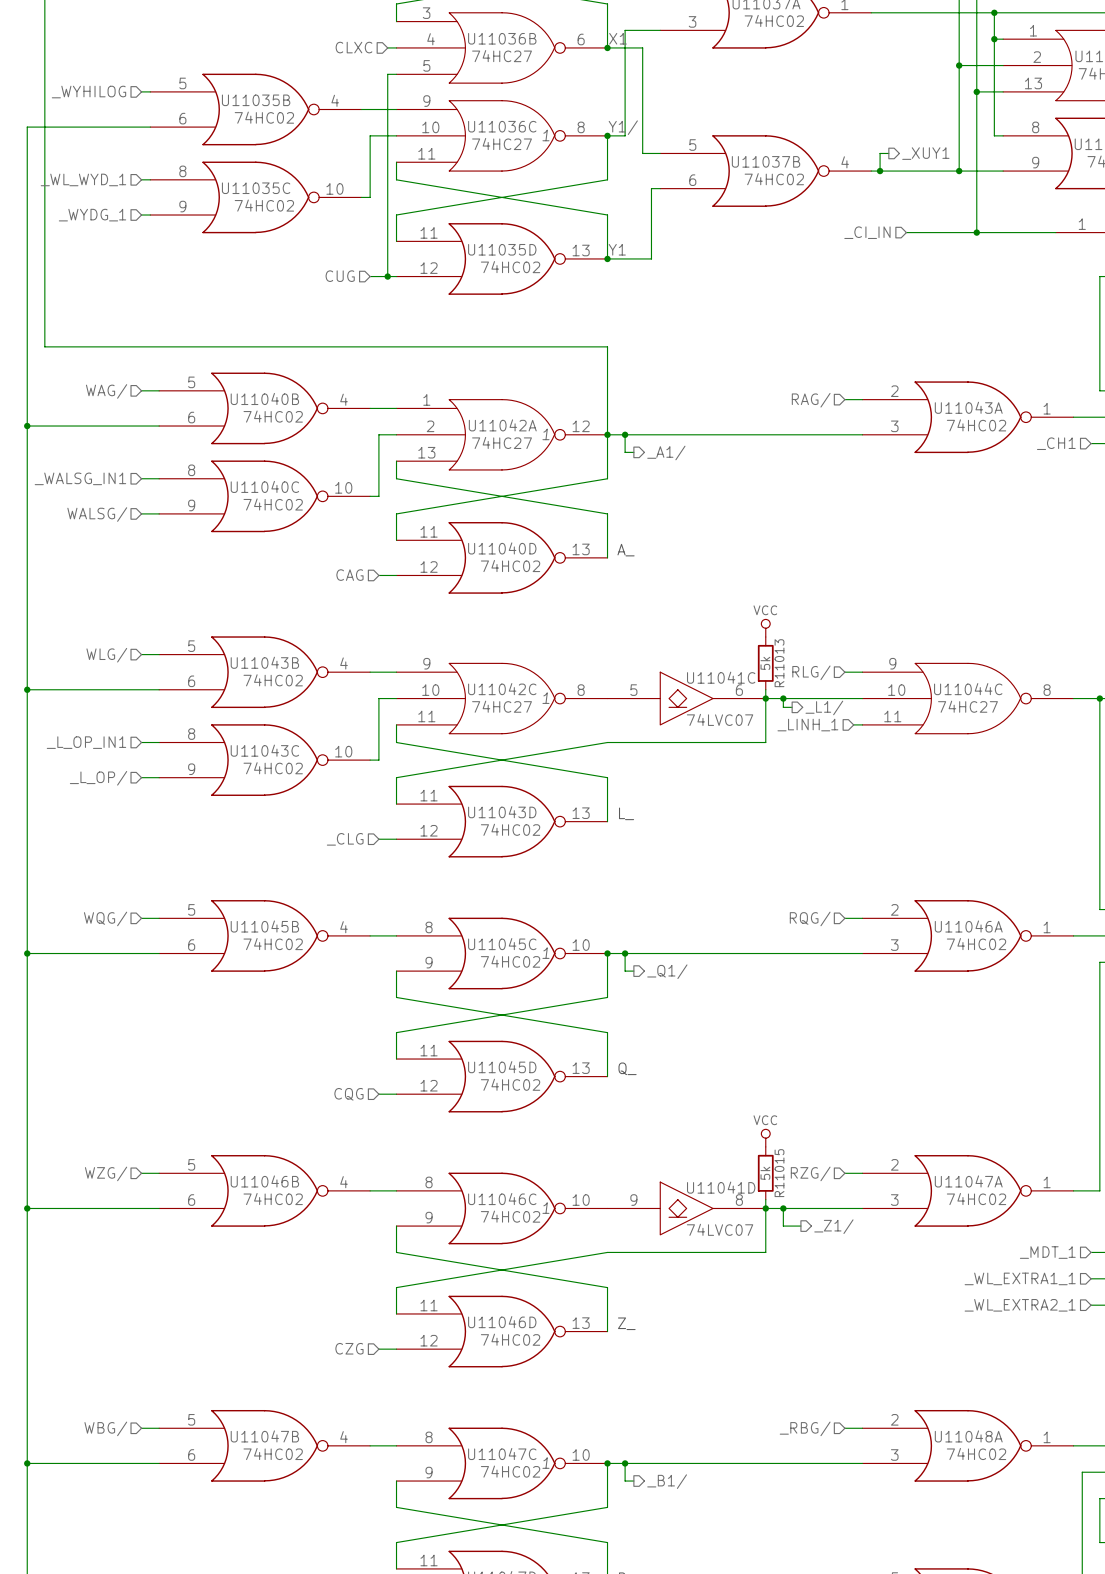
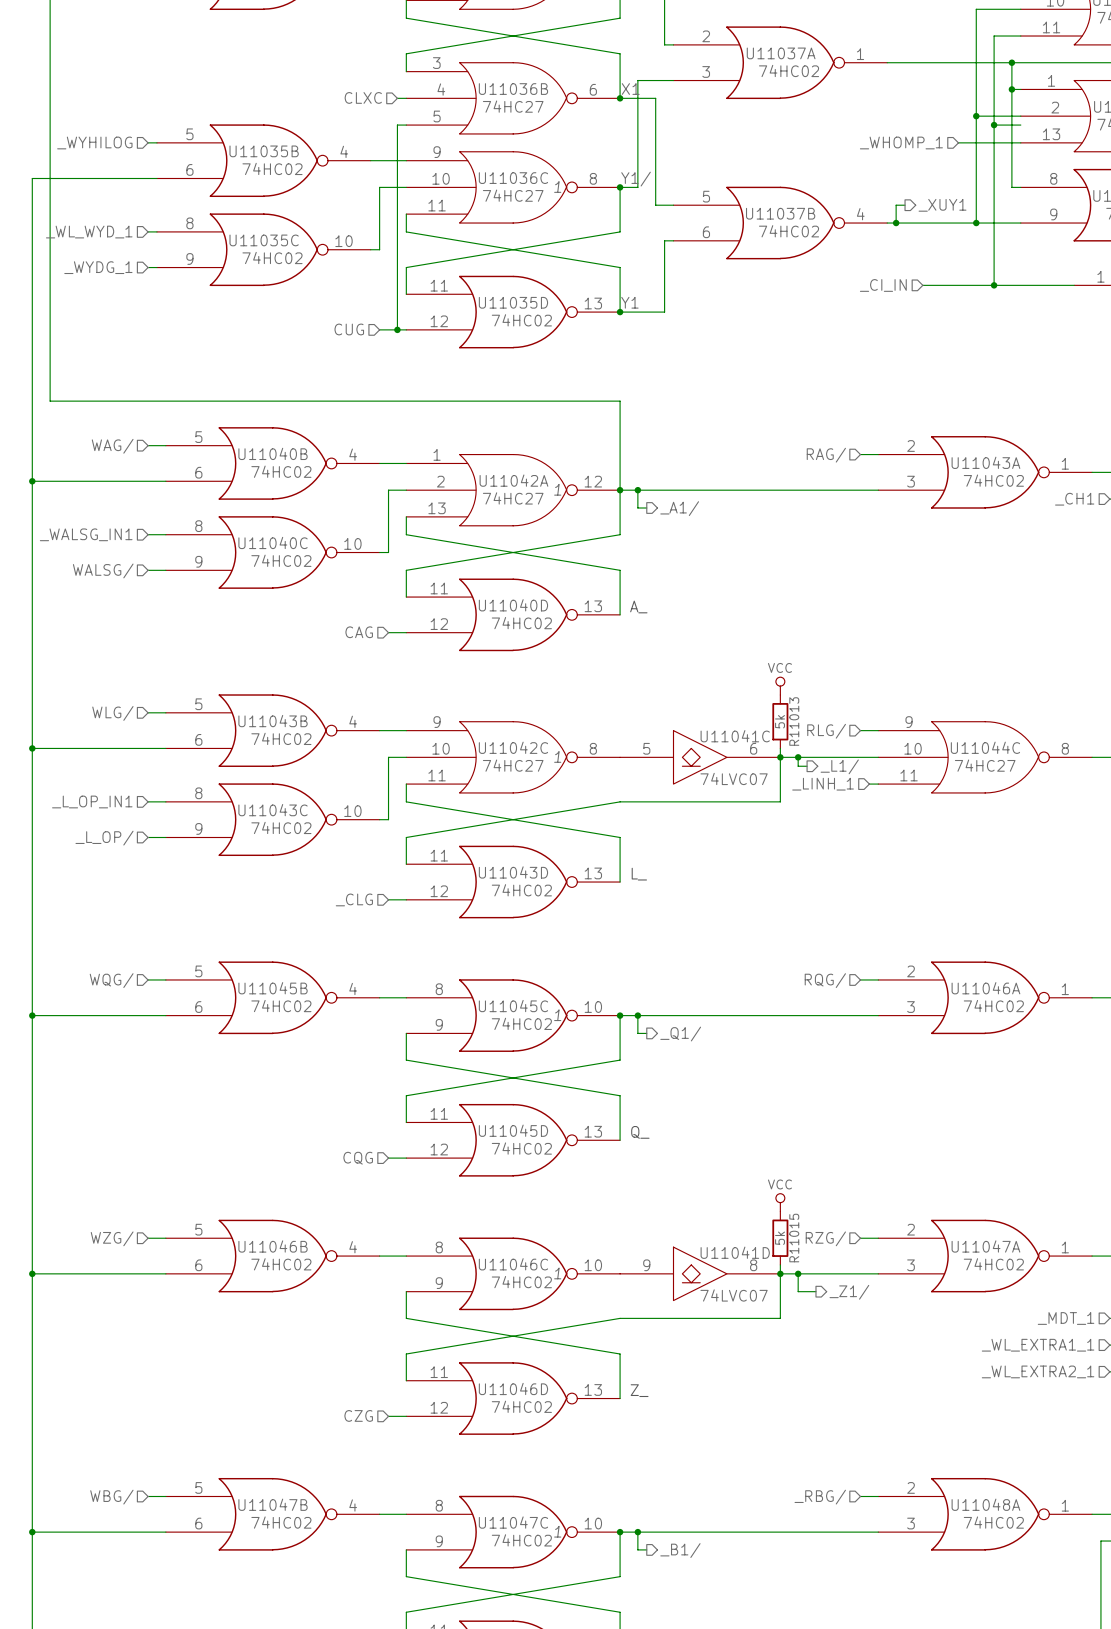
wire: none -> (994, 125) (1020, 125)
wire: none -> (958, 142) (994, 142)
junction position: (976, 91) -> (994, 125)
hierarchical label: none -> _WHOMP_1 (901, 142)

